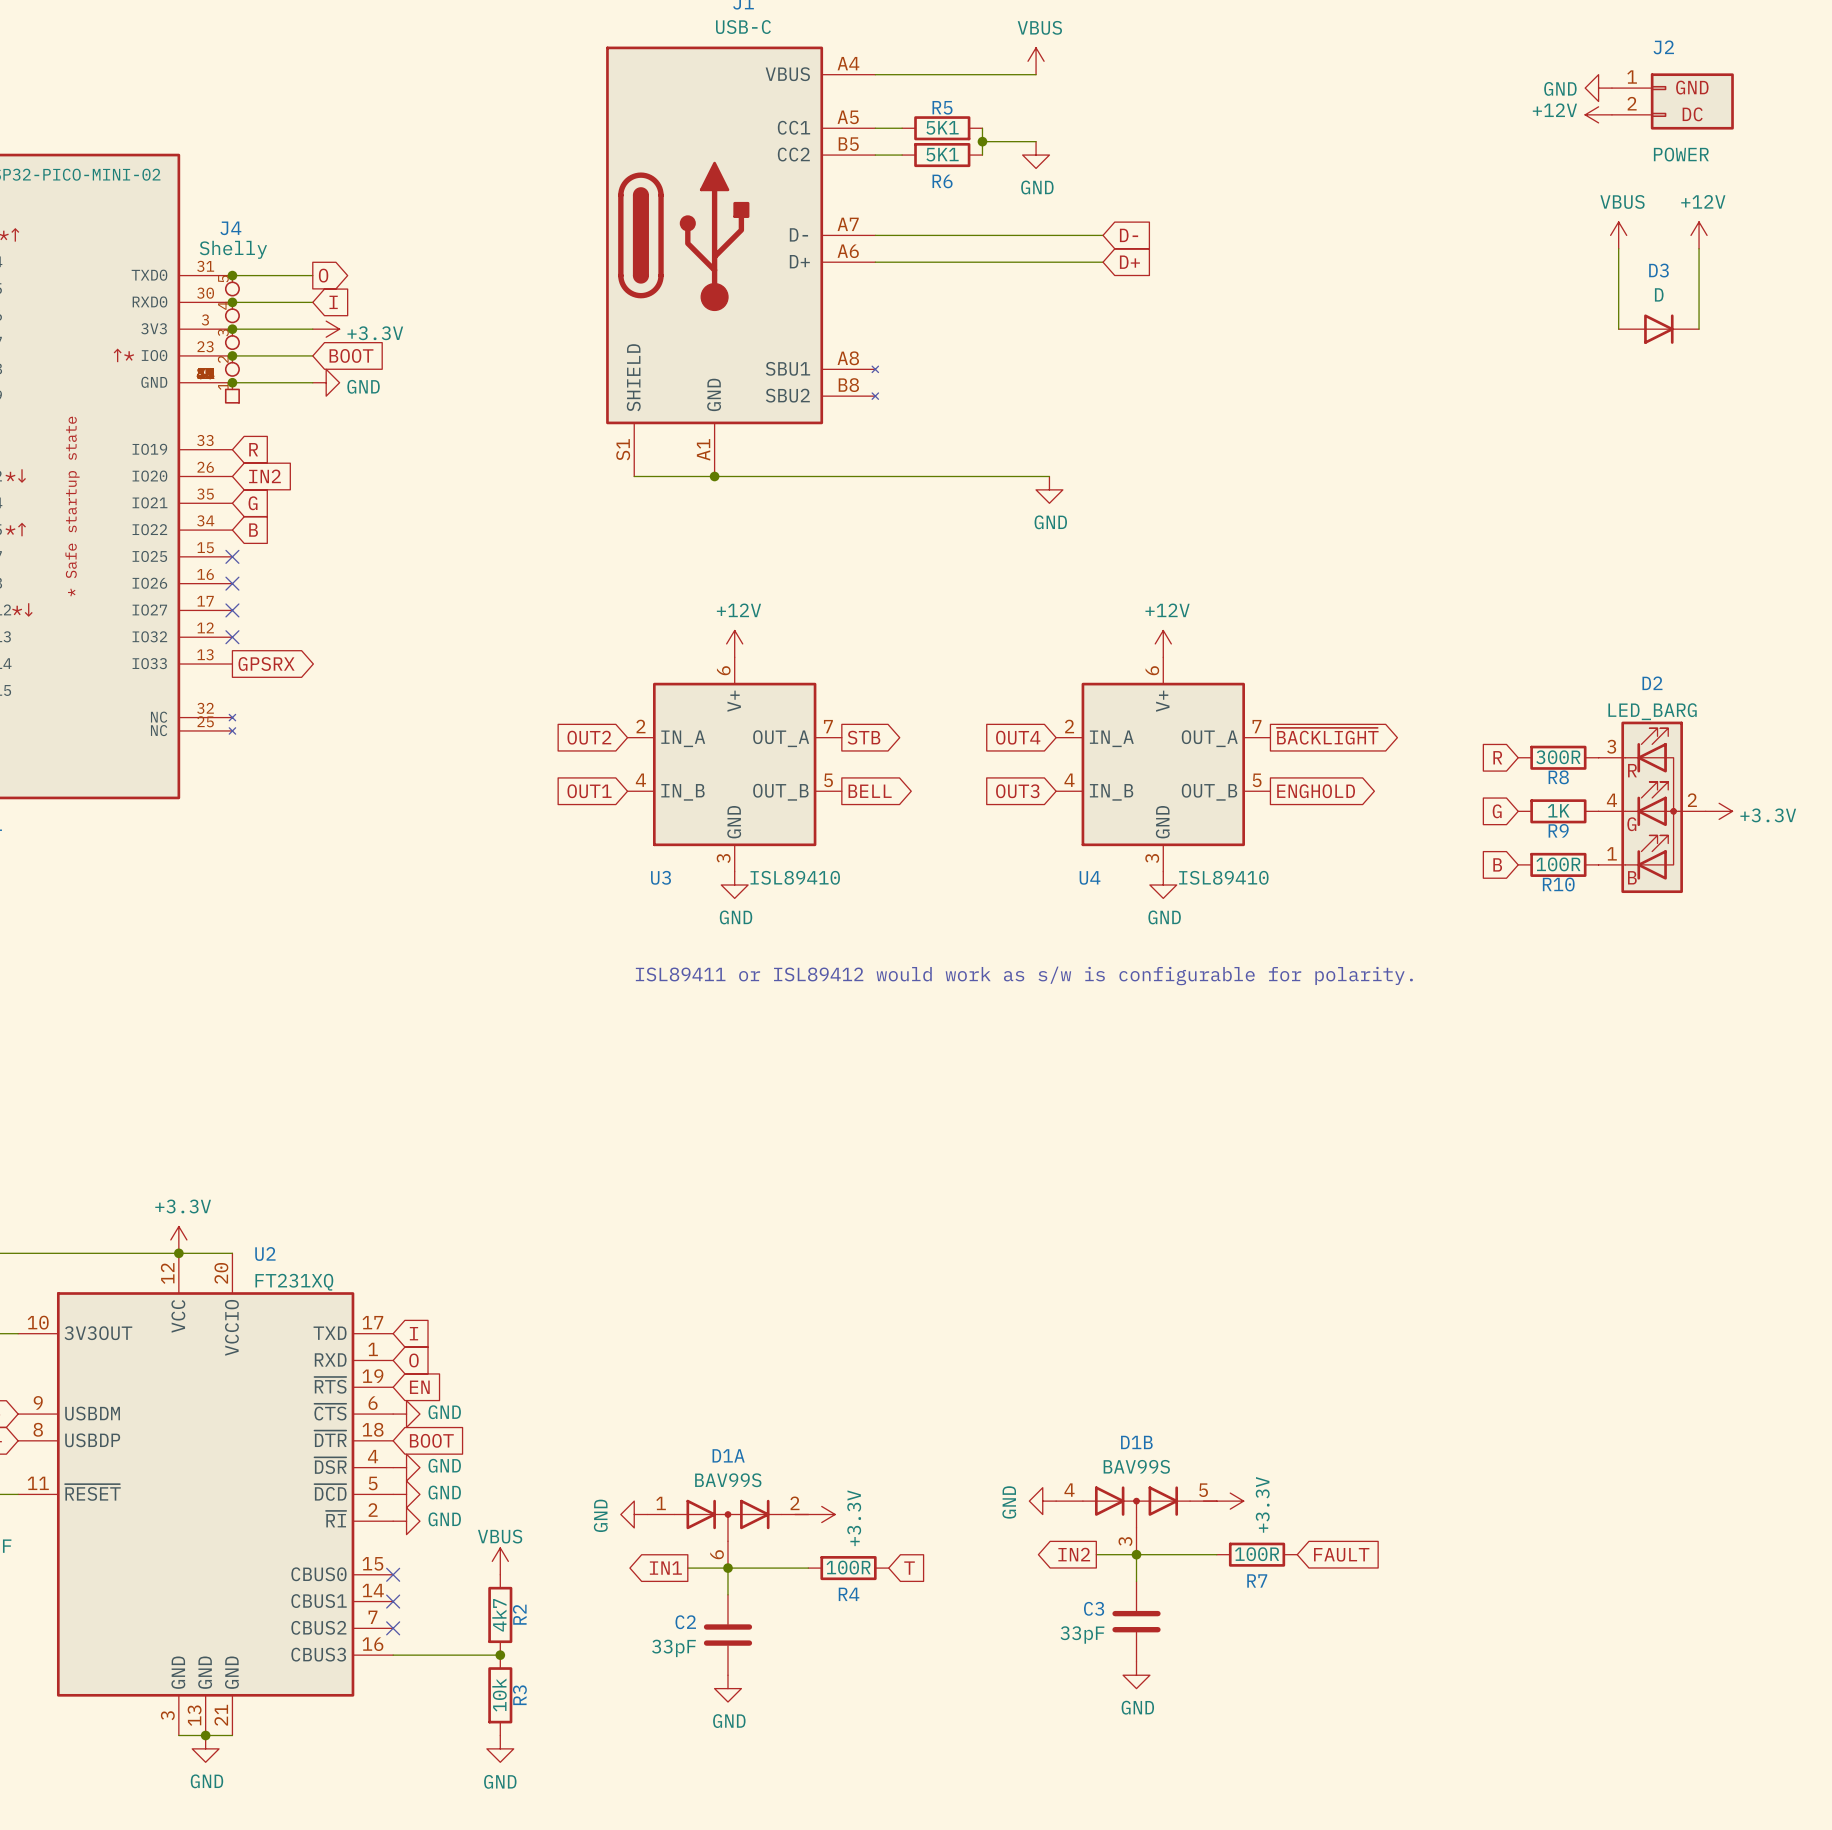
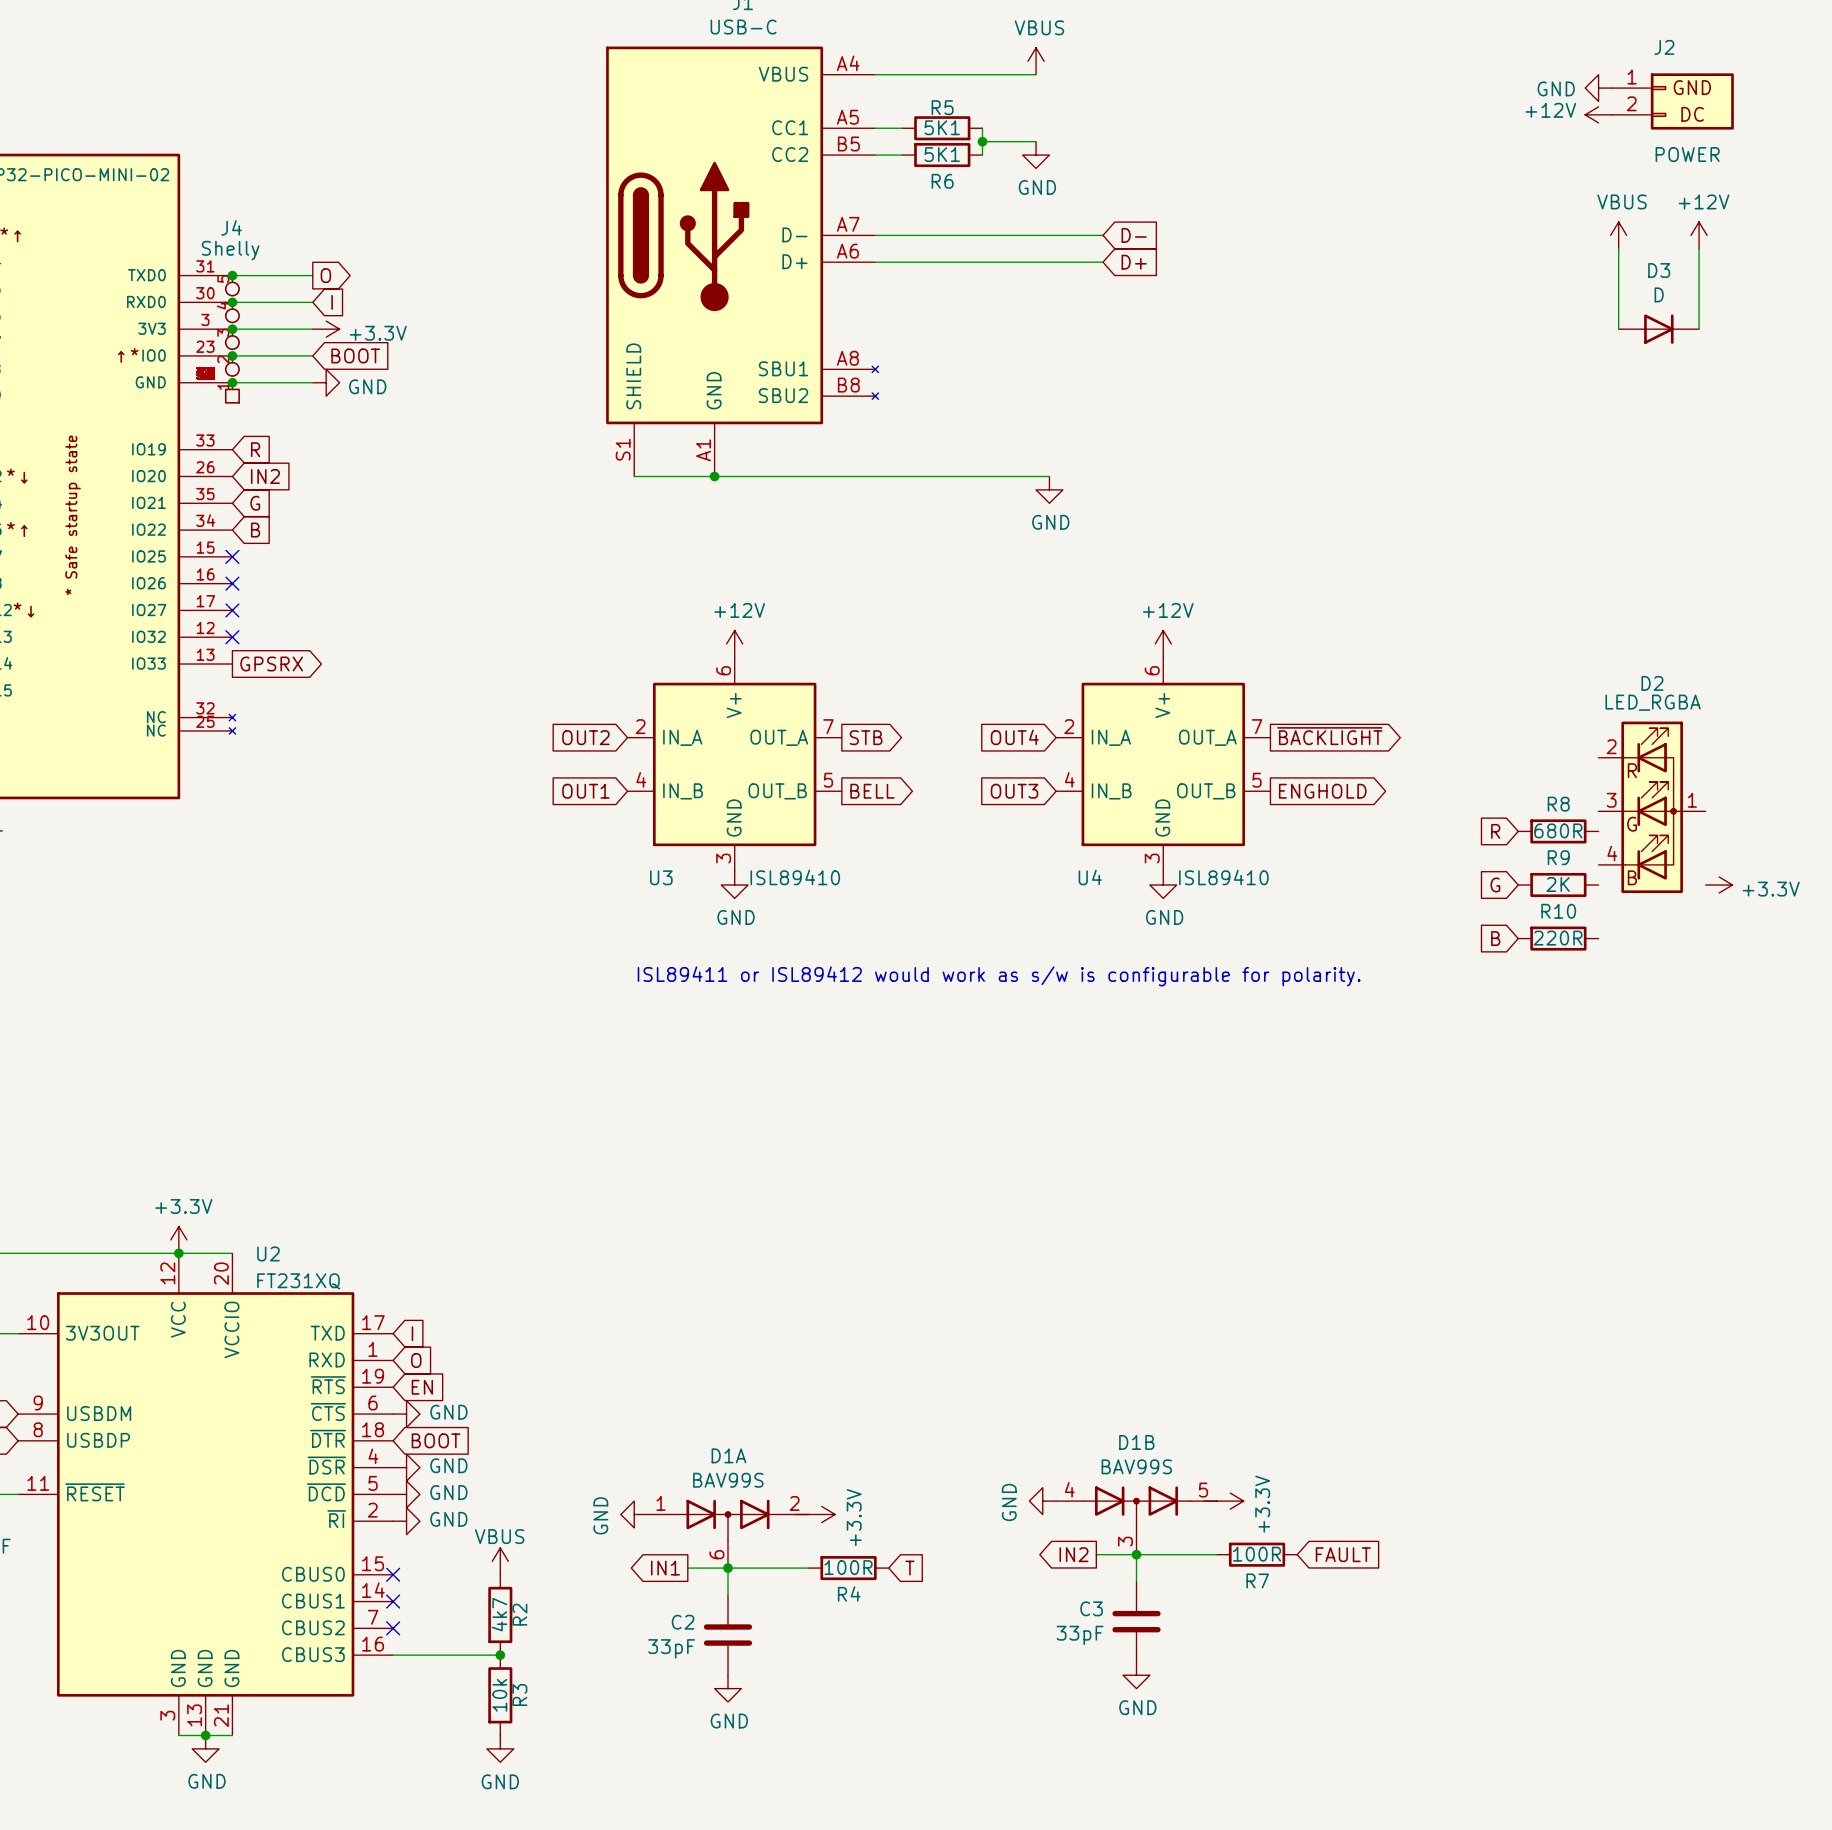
D2 value: LED_BARG (1652, 711) -> LED_RGBA (1653, 702)
D2 pin number: 3 (1611, 746) -> 2 (1611, 746)
global label position: R (1497, 757) -> R (1495, 831)
R8 position: (1558, 757) -> (1558, 831)
R8 value: 300R (1558, 757) -> 680R (1558, 830)
R8 name position: R8 (1558, 777) -> R8 (1558, 804)
D2 pin number: 4 (1611, 800) -> 3 (1611, 800)
D2 pin number: 2 (1692, 800) -> 1 (1692, 800)
R9 value: 1K (1558, 810) -> 2K (1558, 884)
global label position: G (1497, 811) -> G (1495, 885)
R9 position: (1558, 811) -> (1558, 885)
power symbol position: +3.3V (1719, 811) -> +3.3V (1719, 885)
R9 name position: R9 (1558, 830) -> R9 (1558, 857)
D2 pin number: 1 (1612, 853) -> 4 (1612, 853)
global label position: B (1497, 864) -> B (1495, 938)
R10 position: (1558, 864) -> (1558, 938)
R10 value: 100R (1558, 864) -> 220R (1558, 938)
R10 name position: R10 (1558, 884) -> R10 (1558, 911)

